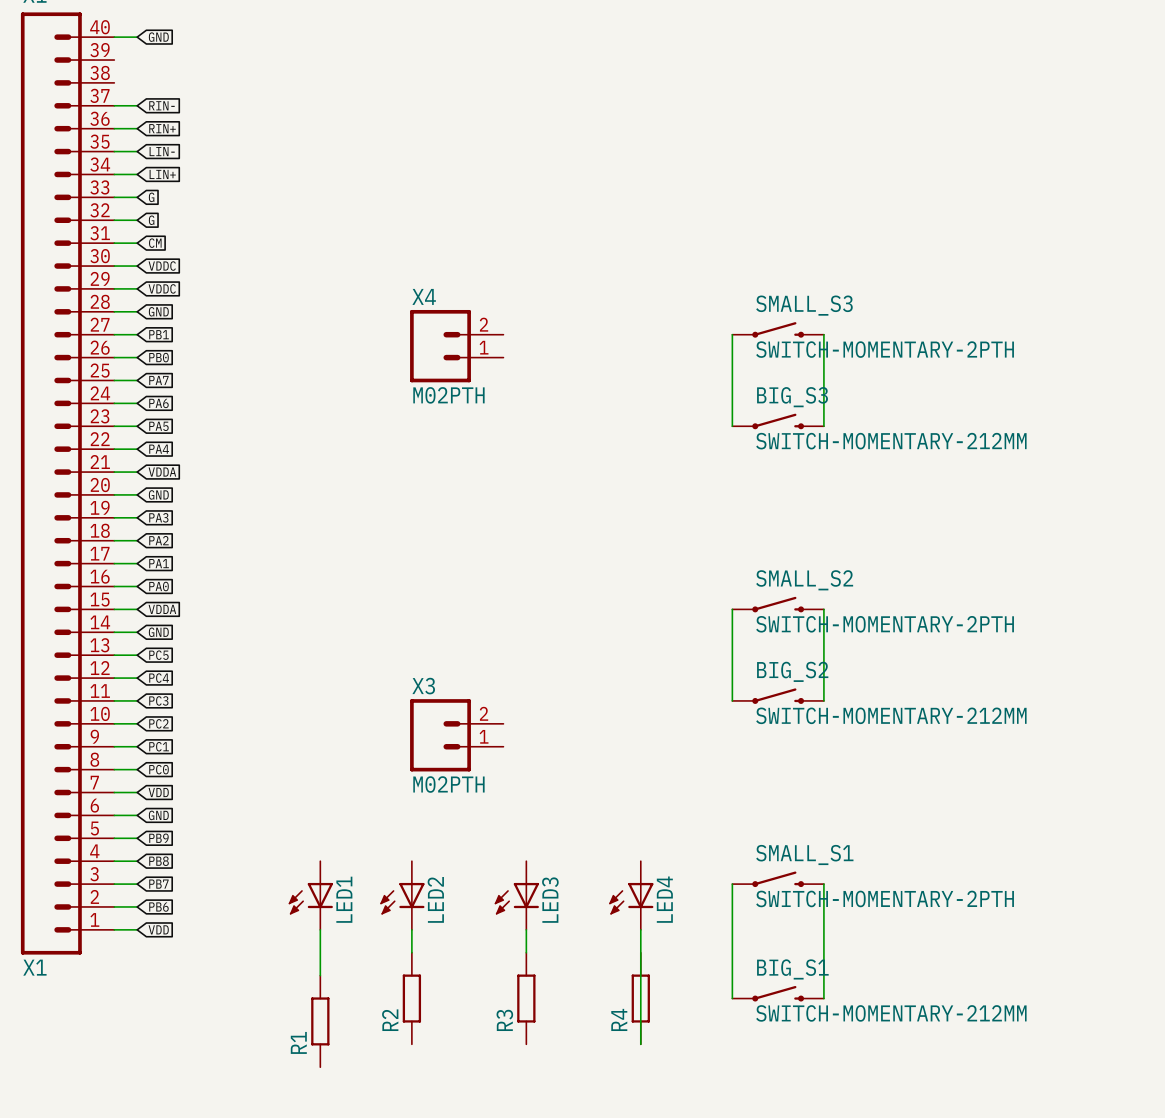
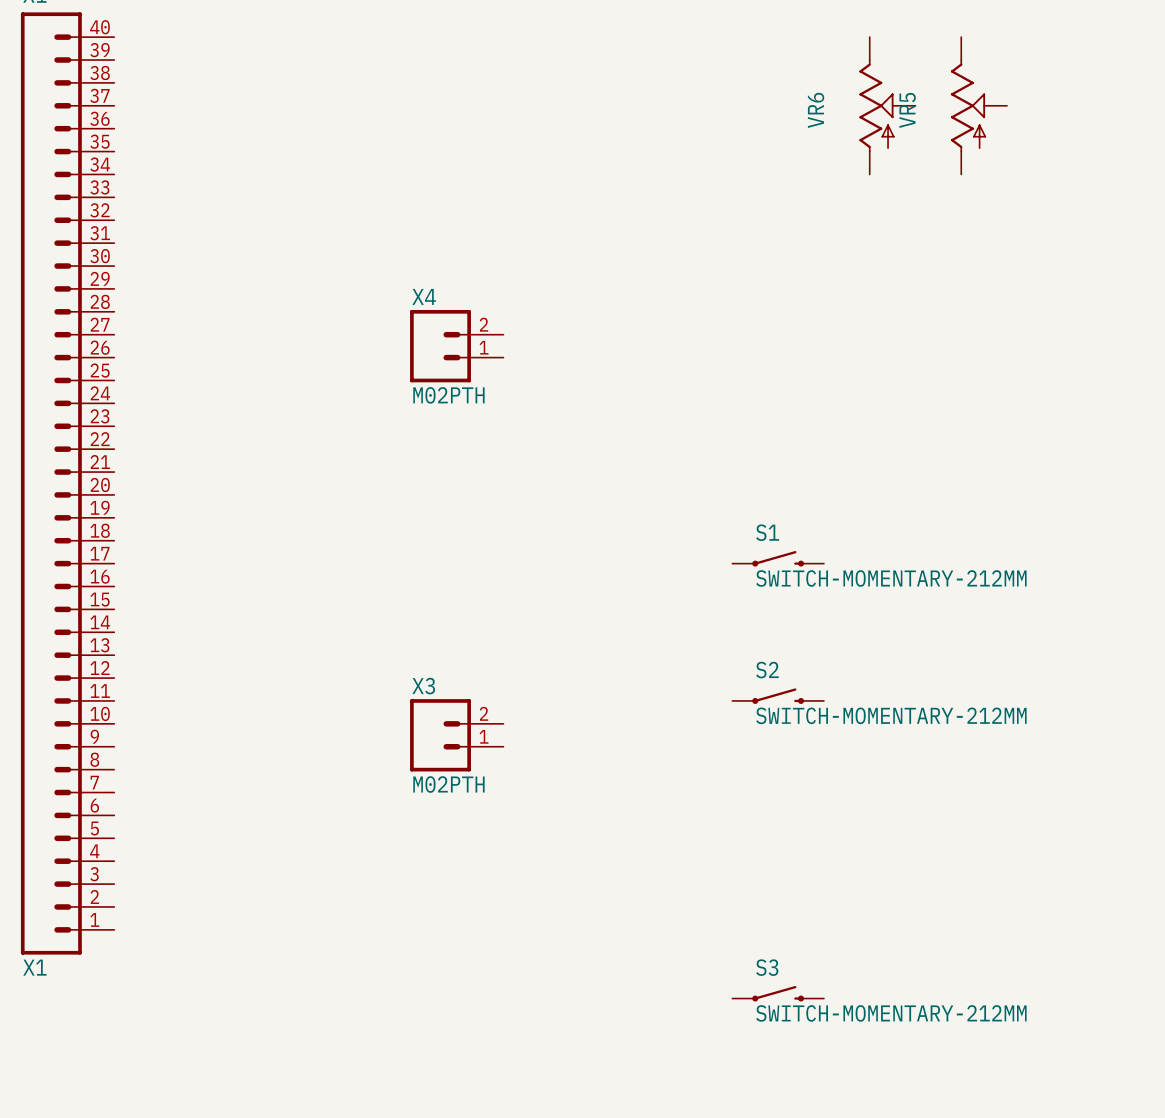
wire: (114, 37) (137, 37) -> none
global label: GND (158, 37) -> none
wire: (114, 105) (137, 105) -> none
global label: RIN- (161, 105) -> none
VR6: none -> (887, 105)
VR5: none -> (979, 105)
wire: (114, 128) (137, 128) -> none
global label: RIN+ (162, 128) -> none
wire: (114, 151) (137, 151) -> none
global label: LIN- (162, 151) -> none
wire: (114, 174) (137, 174) -> none
global label: LIN+ (162, 174) -> none
wire: (114, 197) (137, 197) -> none
global label: G (151, 197) -> none
wire: (114, 220) (137, 220) -> none
global label: G (151, 220) -> none
wire: (114, 243) (137, 243) -> none
global label: CM (155, 243) -> none
wire: (114, 266) (137, 266) -> none
global label: VDDC (162, 266) -> none
wire: (114, 288) (137, 288) -> none
global label: VDDC (162, 288) -> none
wire: (114, 311) (137, 311) -> none
global label: GND (158, 311) -> none
SMALL_S3: SWITCH-MOMENTARY-2PTH (778, 329) -> none
wire: (114, 334) (137, 334) -> none
global label: PB1 (159, 334) -> none
wire: (732, 334) (732, 426) -> none
wire: (823, 334) (823, 426) -> none
wire: (114, 357) (137, 357) -> none
global label: PB0 (159, 357) -> none
wire: (114, 380) (137, 380) -> none
global label: PA7 (158, 380) -> none
wire: (114, 403) (137, 403) -> none
global label: PA6 (158, 403) -> none
BIG_S3: SWITCH-MOMENTARY-212MM (778, 421) -> none
wire: (114, 426) (137, 426) -> none
global label: PA5 (158, 426) -> none
wire: (114, 449) (137, 449) -> none
global label: PA4 (159, 449) -> none
wire: (114, 472) (137, 472) -> none
global label: VDDA (162, 472) -> none
wire: (114, 494) (137, 494) -> none
global label: GND (158, 494) -> none
wire: (114, 517) (137, 517) -> none
global label: PA3 (158, 517) -> none
wire: (114, 540) (137, 540) -> none
global label: PA2 (158, 540) -> none
S1: none -> SWITCH-MOMENTARY-212MM (778, 558)
wire: (114, 563) (137, 563) -> none
global label: PA1 (159, 563) -> none
wire: (114, 586) (137, 586) -> none
global label: PA0 (159, 586) -> none
SMALL_S2: SWITCH-MOMENTARY-2PTH (778, 604) -> none
wire: (114, 609) (137, 609) -> none
global label: VDDA (162, 609) -> none
wire: (732, 609) (732, 700) -> none
wire: (823, 609) (823, 700) -> none
wire: (114, 632) (137, 632) -> none
global label: GND (158, 632) -> none
wire: (114, 655) (137, 655) -> none
global label: PC5 (158, 655) -> none
BIG_S2 name: BIG_S2 (792, 671) -> S2 (767, 670)
wire: (114, 678) (137, 678) -> none
global label: PC4 (159, 678) -> none
wire: (114, 700) (137, 700) -> none
global label: PC3 (158, 700) -> none
wire: (114, 723) (137, 723) -> none
global label: PC2 (158, 723) -> none
wire: (114, 746) (137, 746) -> none
global label: PC1 (159, 746) -> none
wire: (114, 769) (137, 769) -> none
global label: PC0 (159, 769) -> none
wire: (114, 792) (137, 792) -> none
global label: VDD (158, 792) -> none
wire: (114, 815) (137, 815) -> none
global label: GND (158, 815) -> none
wire: (114, 838) (137, 838) -> none
global label: PB9 (158, 838) -> none
wire: (114, 861) (137, 861) -> none
global label: PB8 (159, 861) -> none
SMALL_S1: SWITCH-MOMENTARY-2PTH (778, 879) -> none
wire: (114, 884) (137, 884) -> none
global label: PB7 (158, 884) -> none
wire: (732, 884) (732, 998) -> none
wire: (823, 884) (823, 998) -> none
LED1: (310, 895) -> none
LED2: (402, 895) -> none
LED3: (516, 895) -> none
LED4: (631, 895) -> none
wire: (114, 906) (137, 906) -> none
global label: PB6 (158, 907) -> none
wire: (114, 929) (137, 929) -> none
global label: VDD (158, 929) -> none
wire: (320, 929) (320, 975) -> none
wire: (411, 929) (411, 952) -> none
wire: (526, 929) (526, 952) -> none
wire: (640, 929) (640, 1044) -> none
BIG_S1 name: BIG_S1 (792, 969) -> S3 (767, 967)
R2: (411, 998) -> none
R3: (526, 998) -> none
R4: (640, 998) -> none
R1: (320, 1021) -> none

